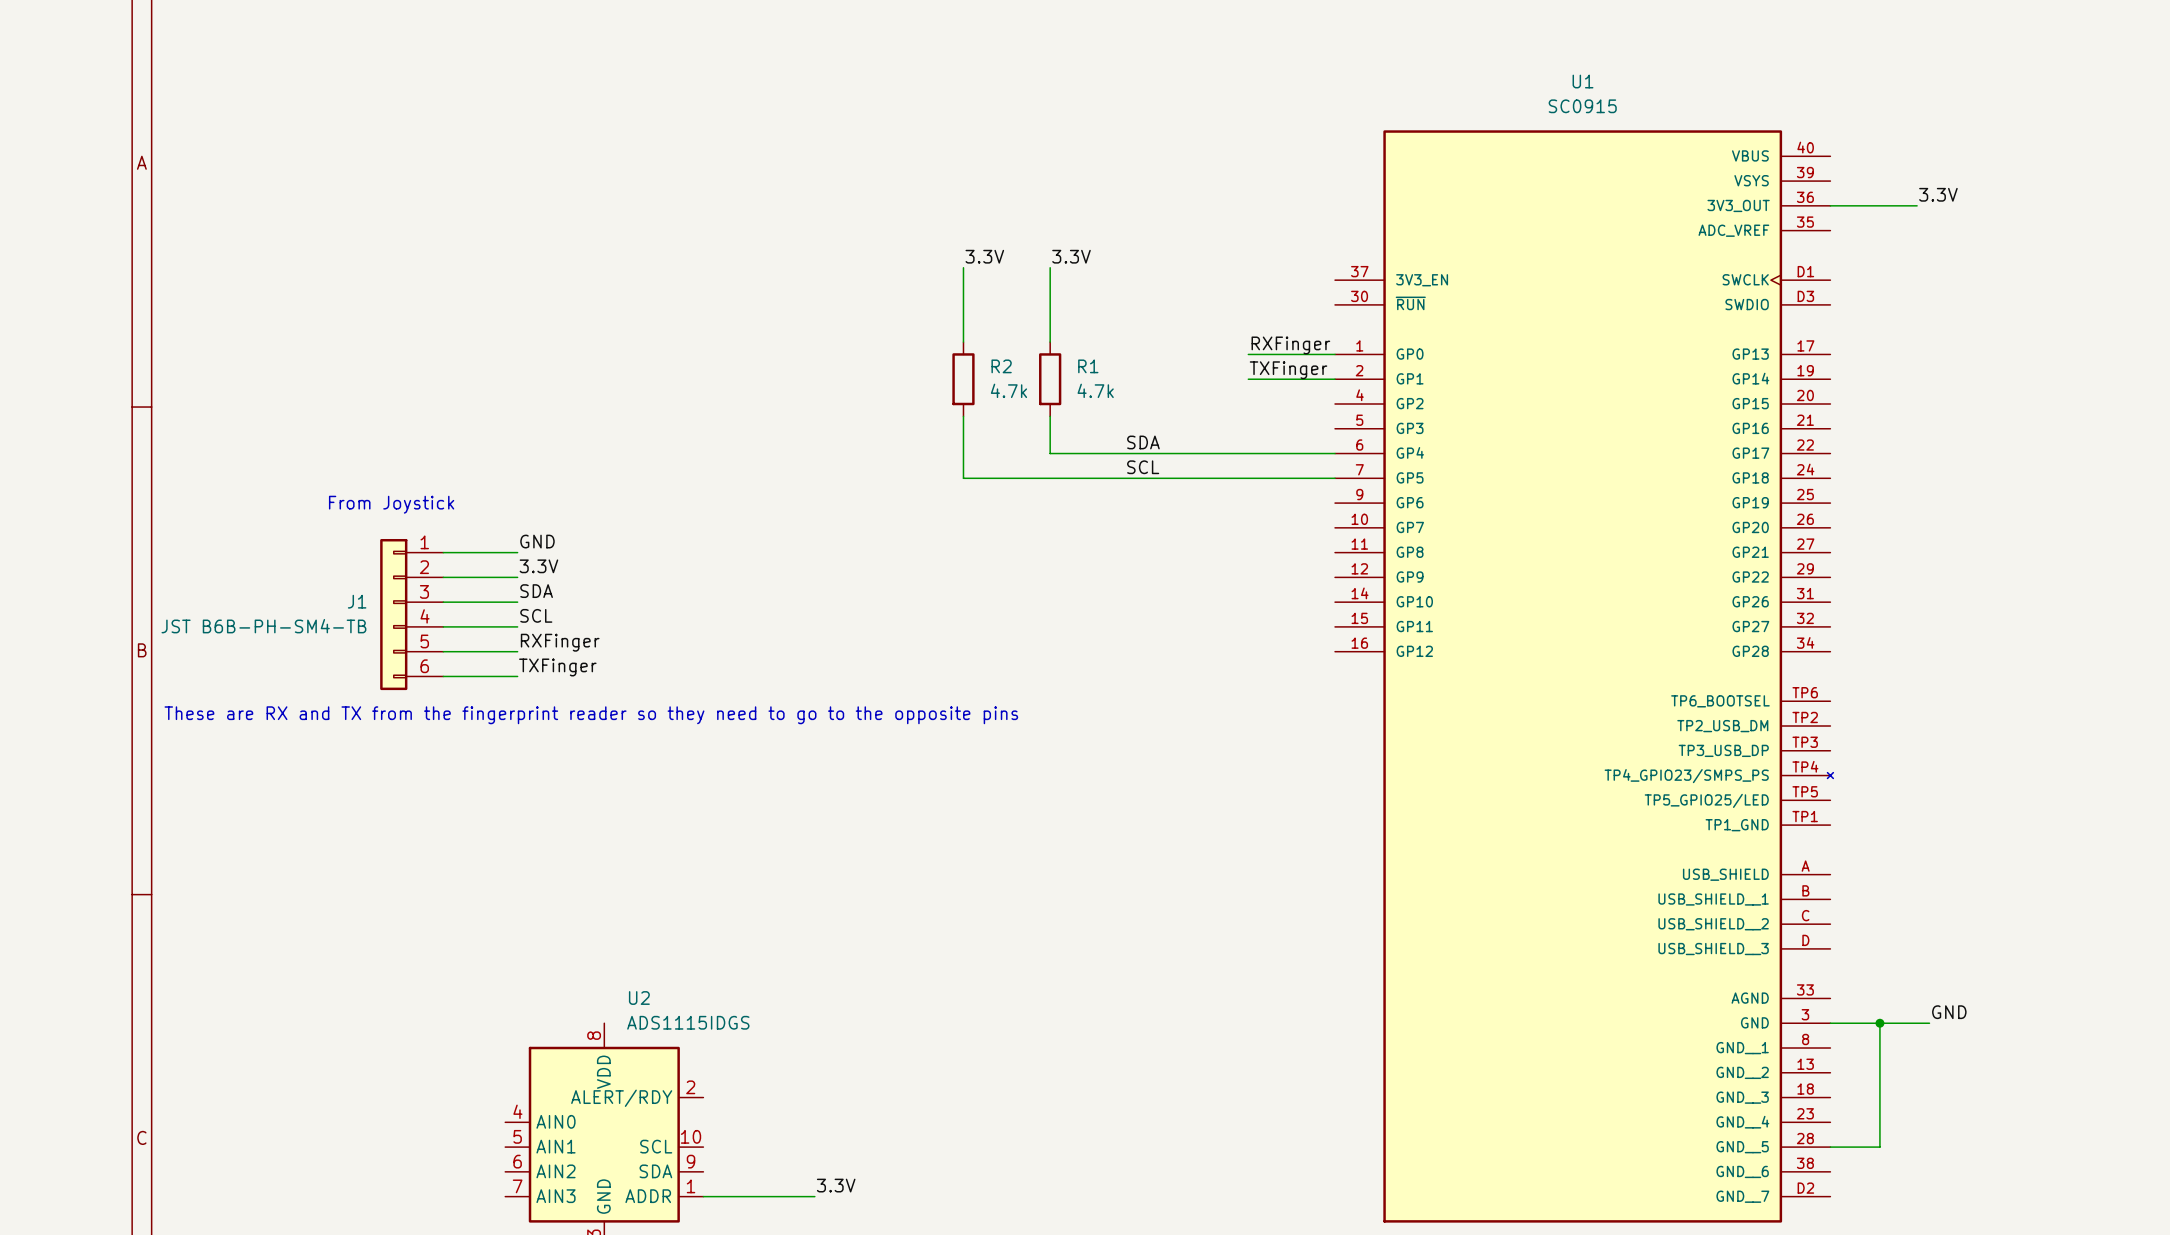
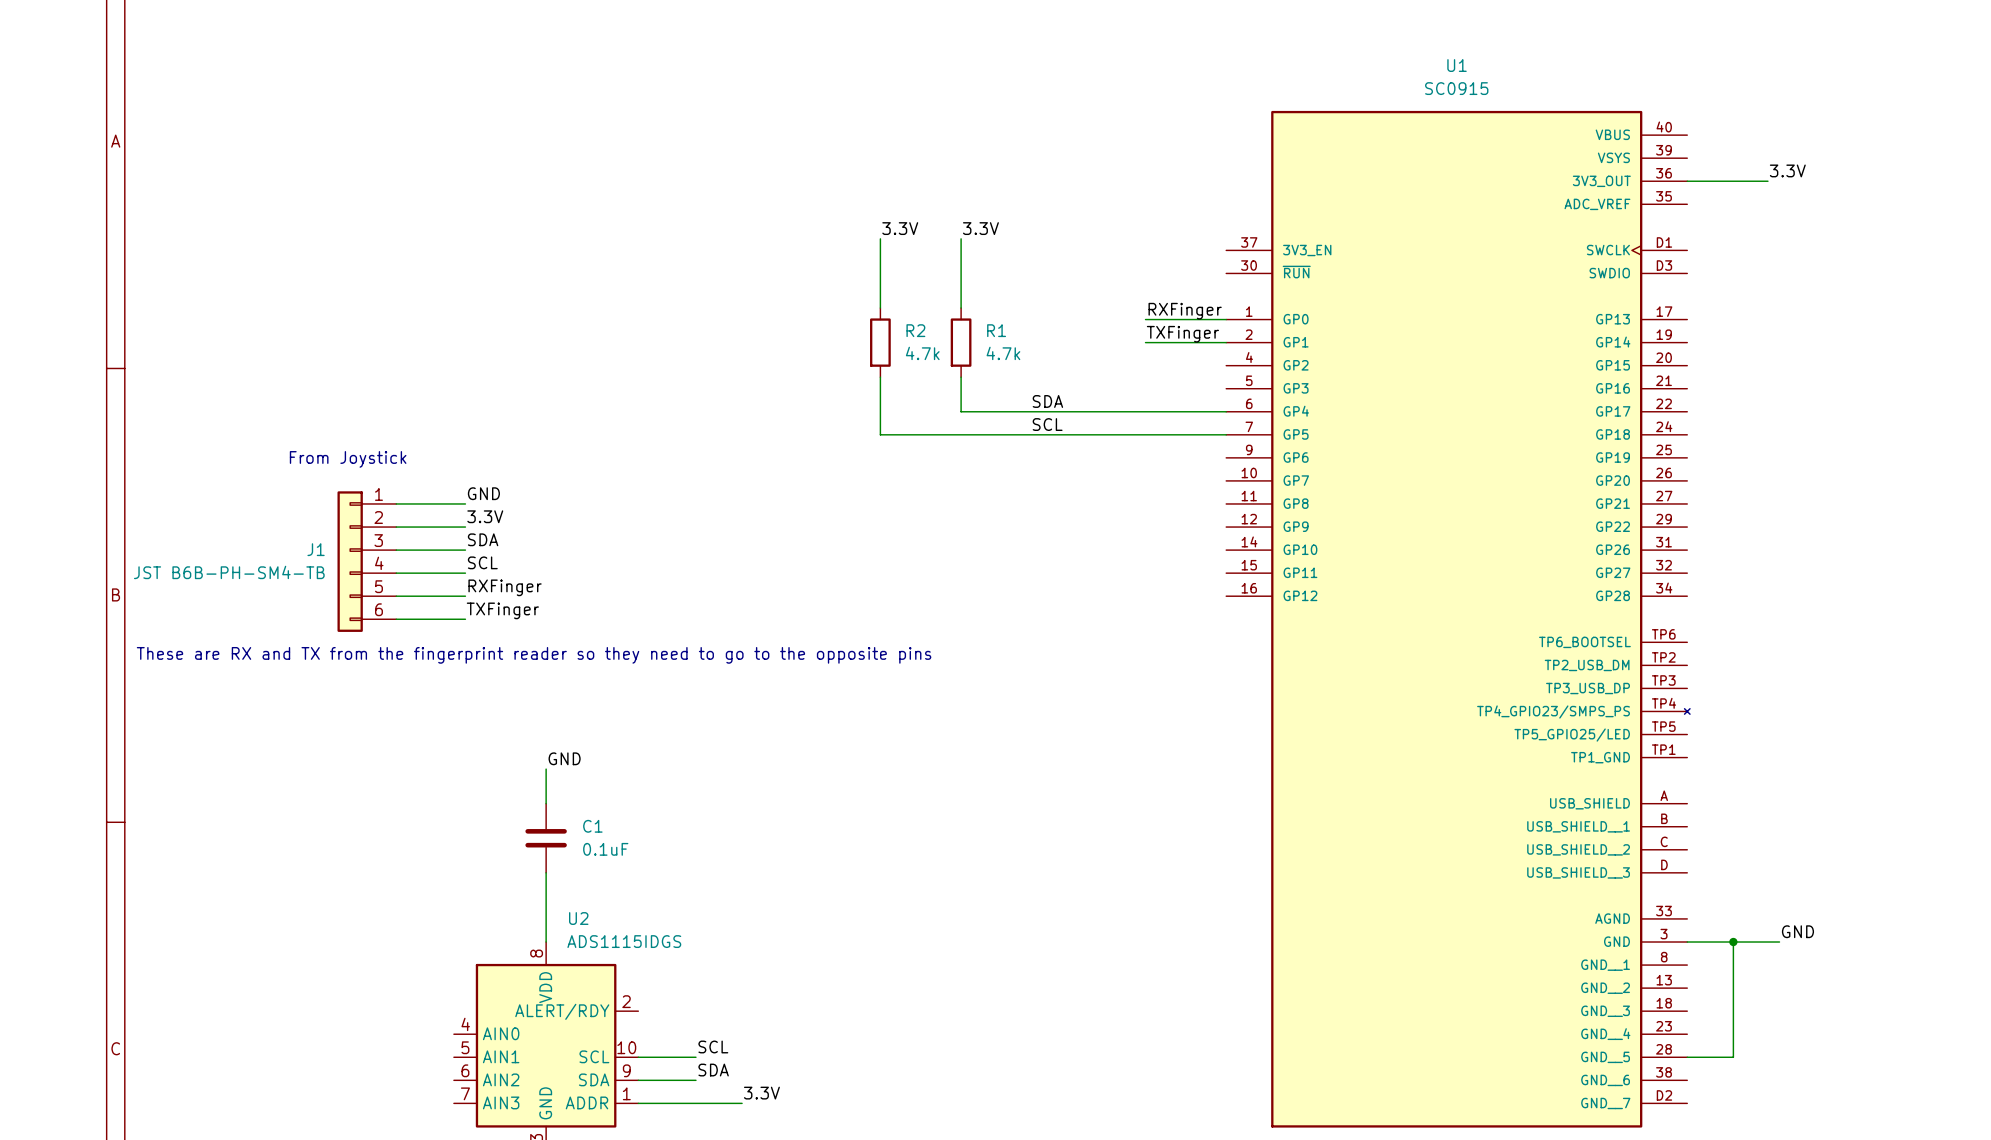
label: none -> GND (564, 758)
wire: none -> (546, 769) (546, 803)
C1: none -> 0.1uF (546, 838)
wire: none -> (546, 872) (546, 942)
label: none -> SCL (713, 1046)
wire: none -> (638, 1057) (695, 1057)
label: none -> SDA (713, 1070)
wire: none -> (638, 1080) (695, 1080)

